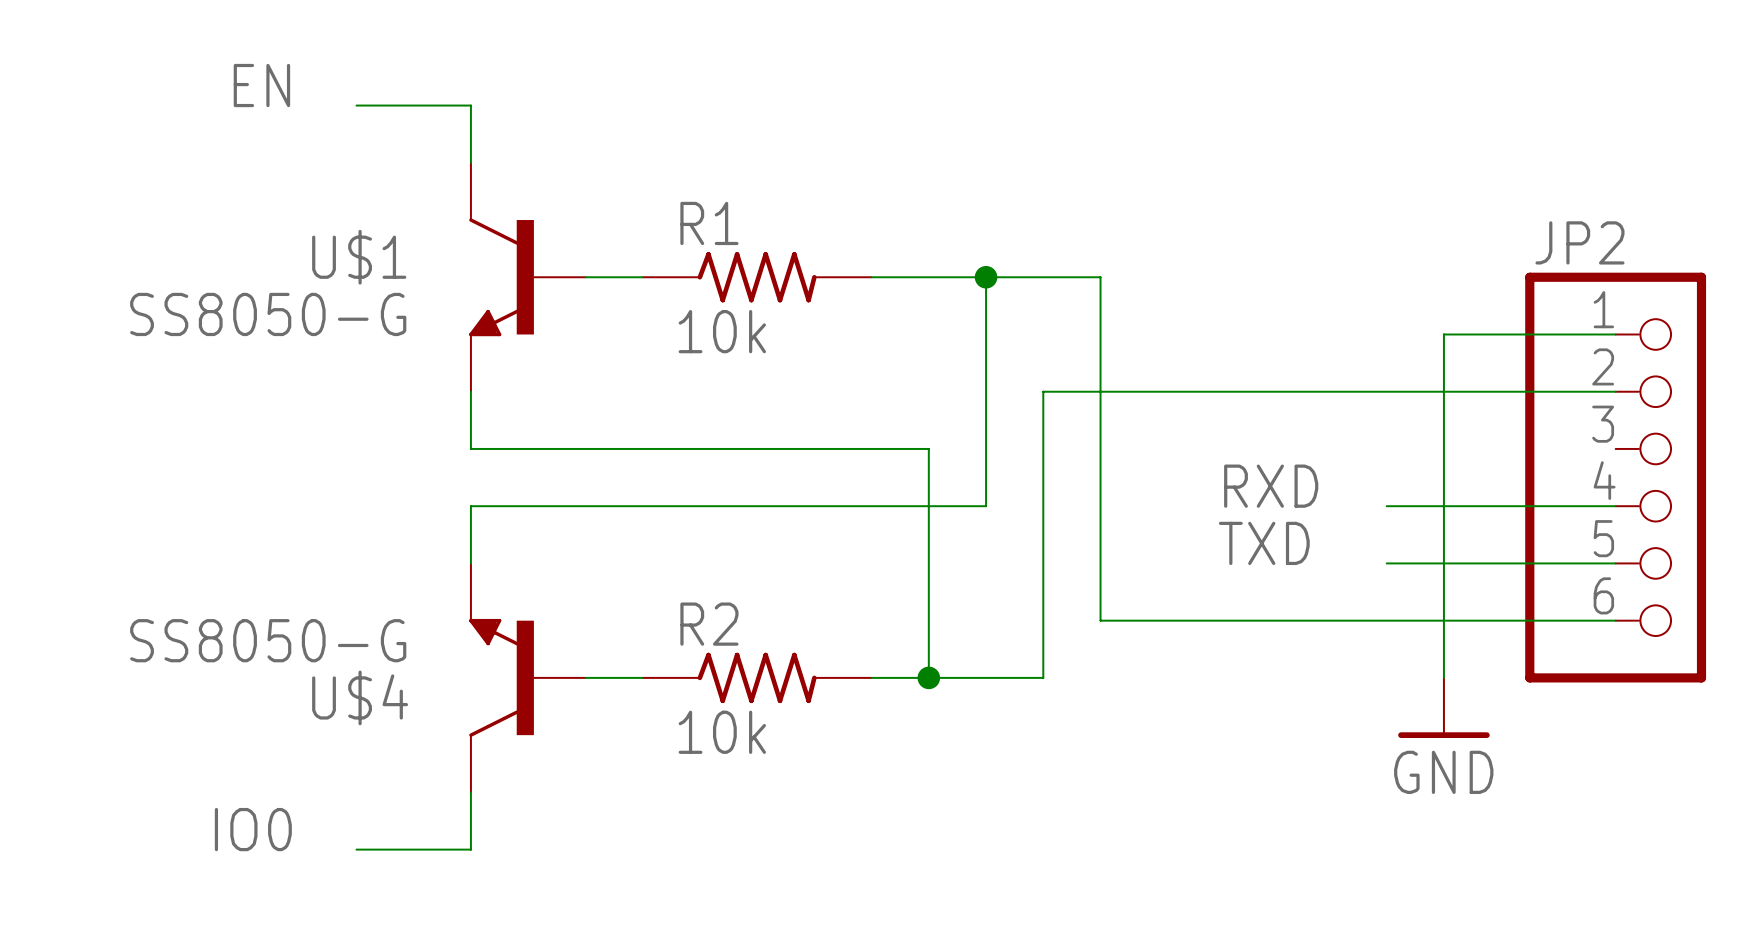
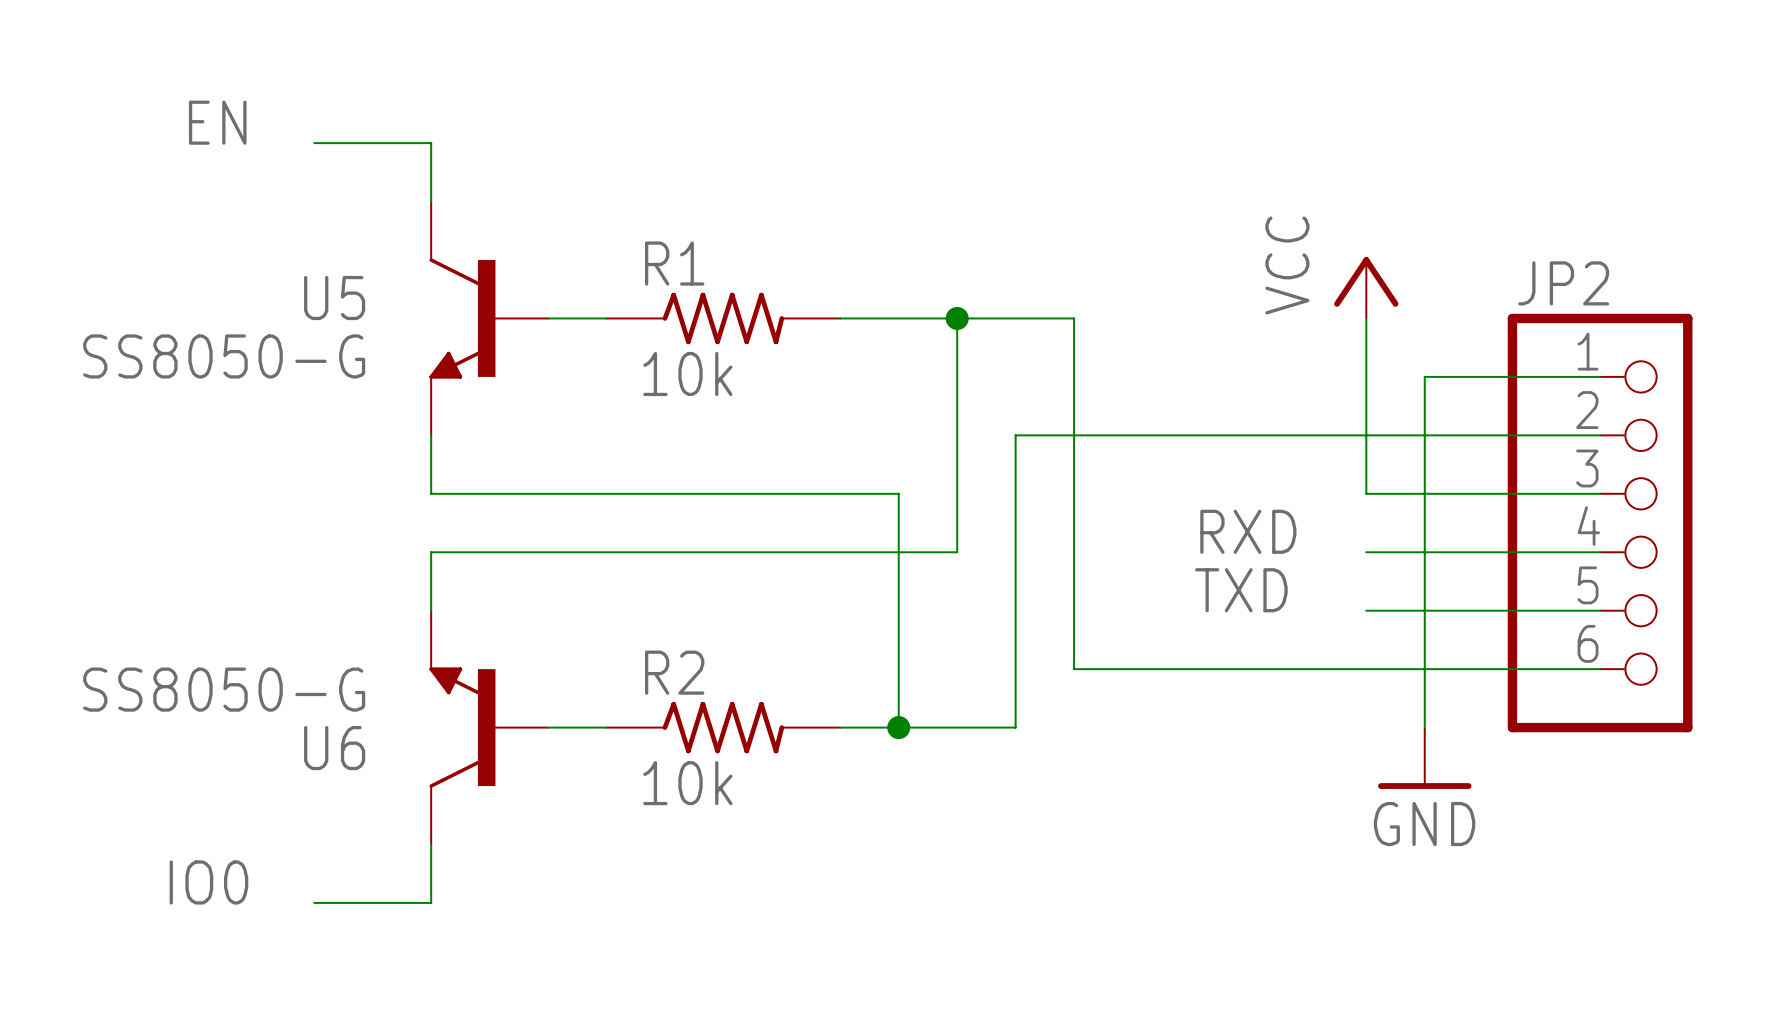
power symbol: none -> VCC (1366, 287)
U$1 name: U$1 (359, 257) -> U5 (334, 298)
wire: none -> (1366, 318) (1366, 493) (1600, 493)
U$4 name: U$4 (360, 697) -> U6 (334, 748)

